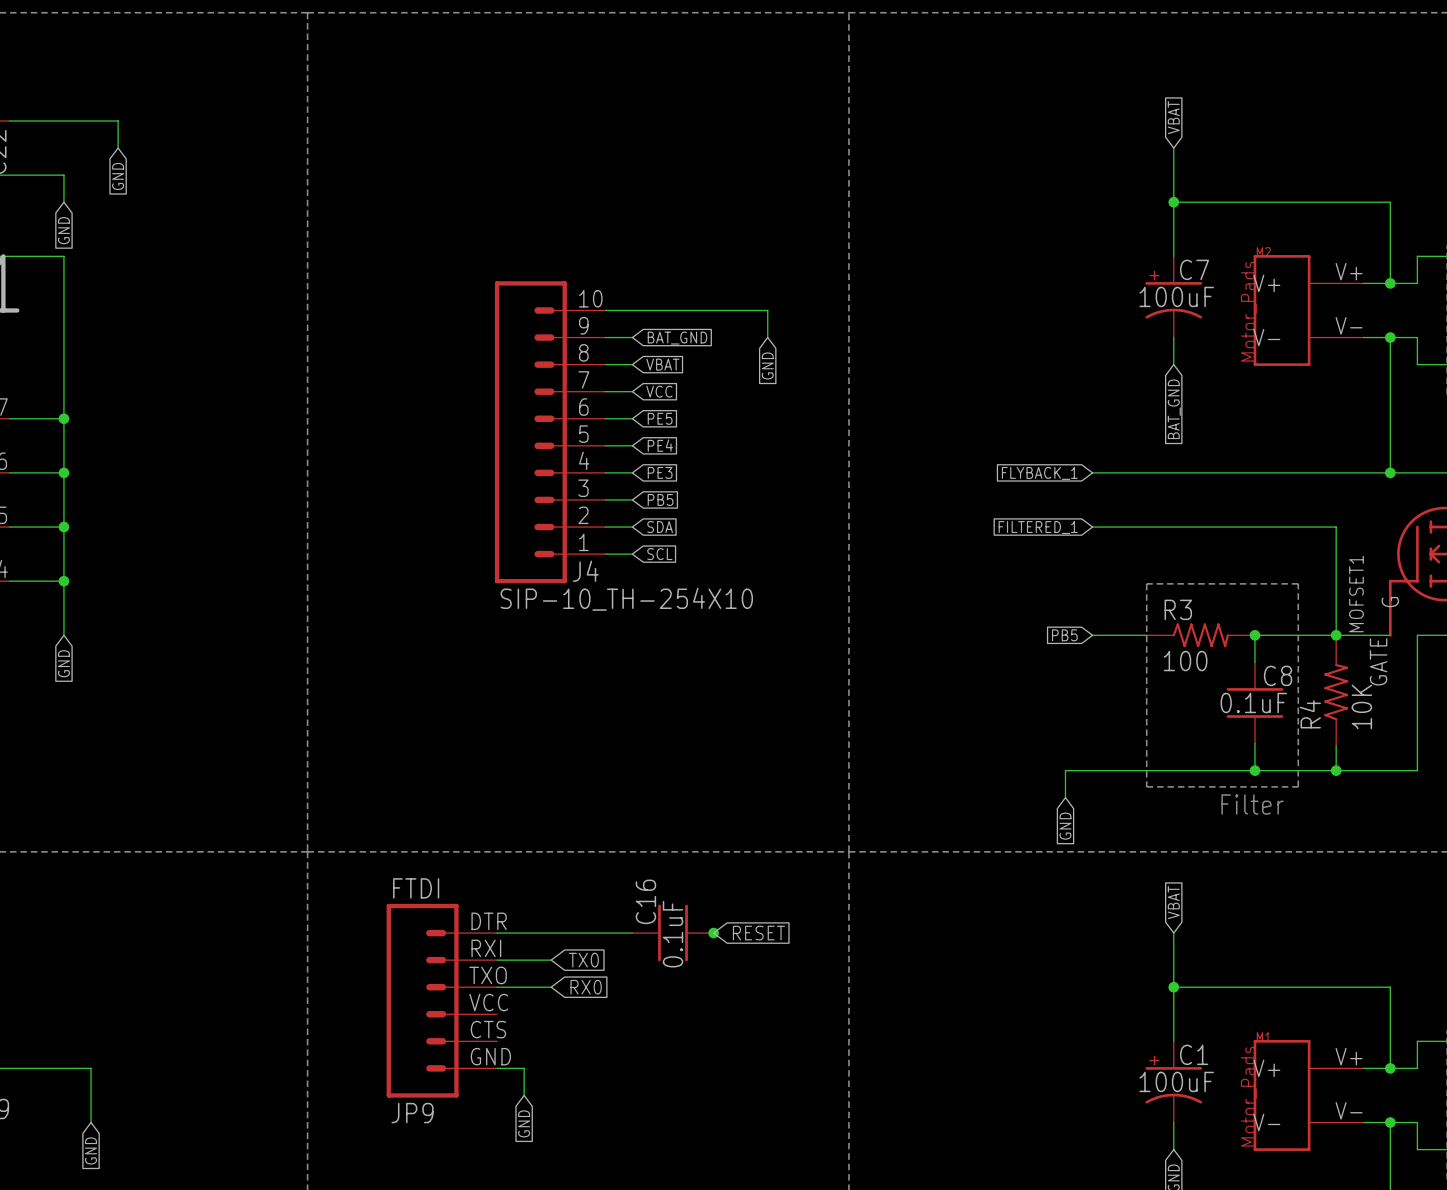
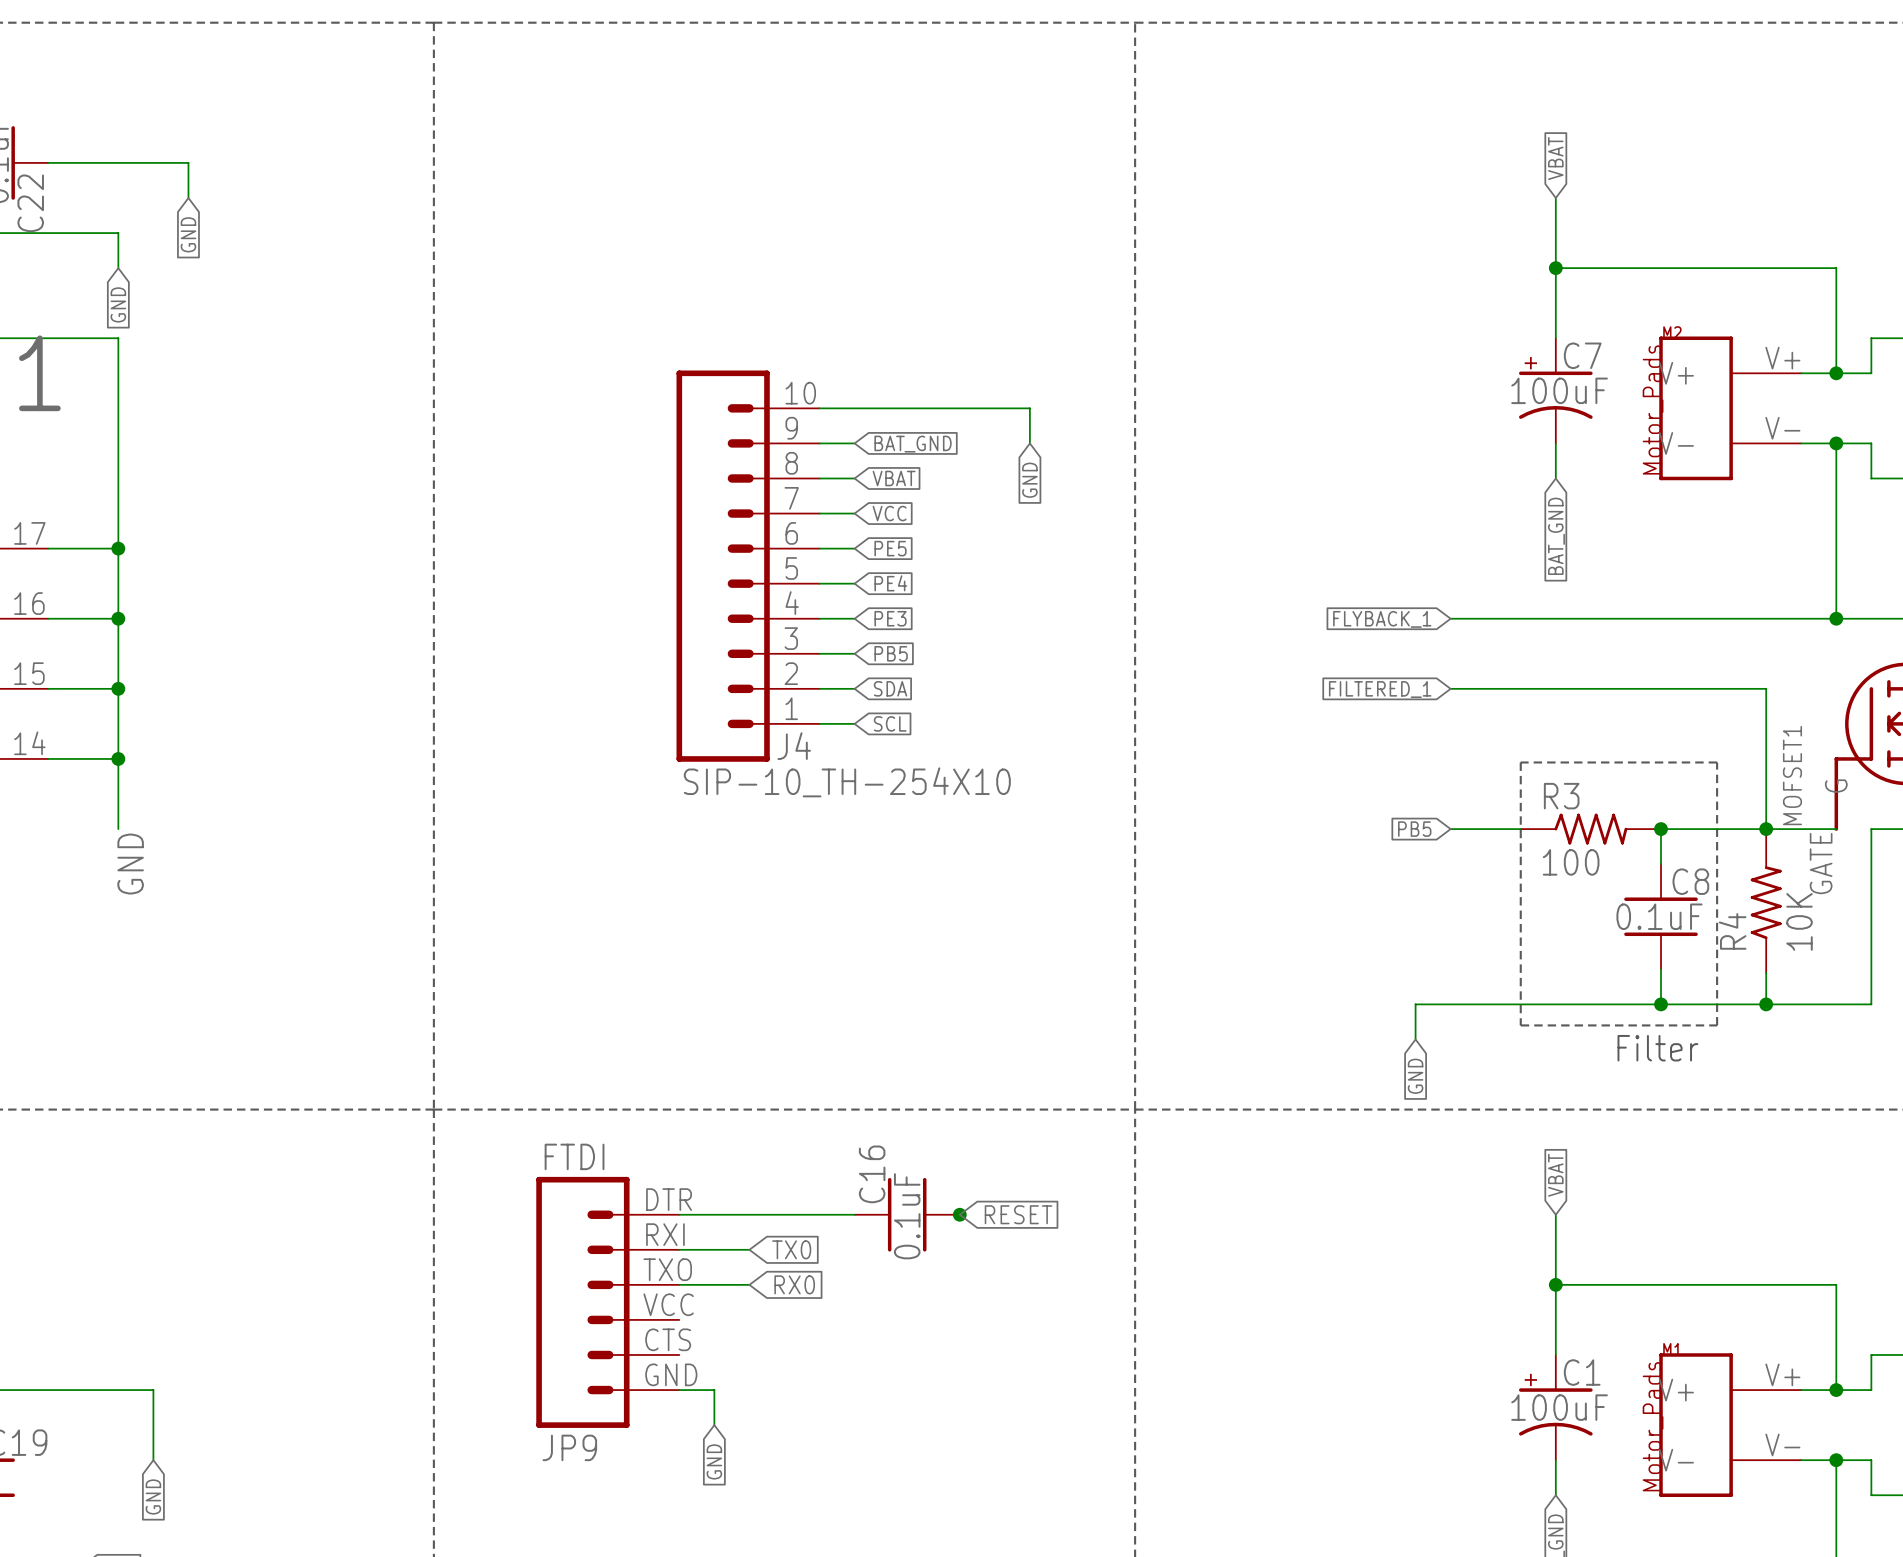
label: none -> GND (130, 864)
global label: GND (63, 663) -> none

